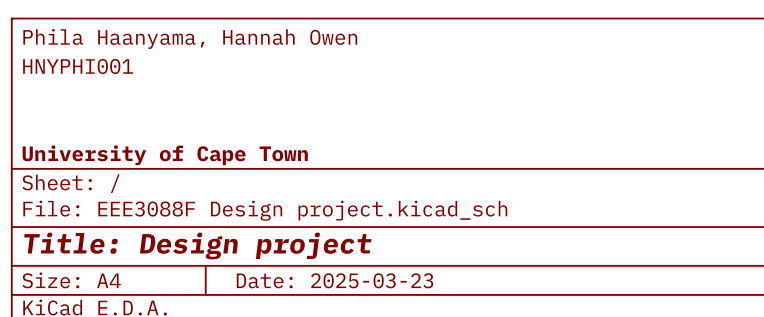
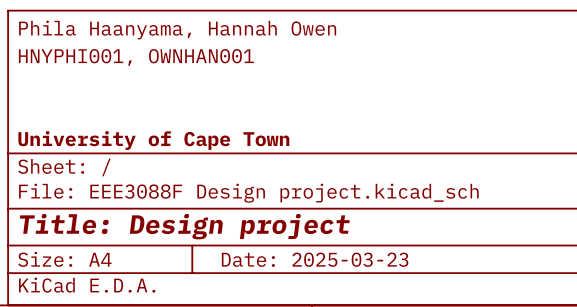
title block: HNYPHI001 (78, 66) -> HNYPHI001, OWNHAN001 (136, 57)

